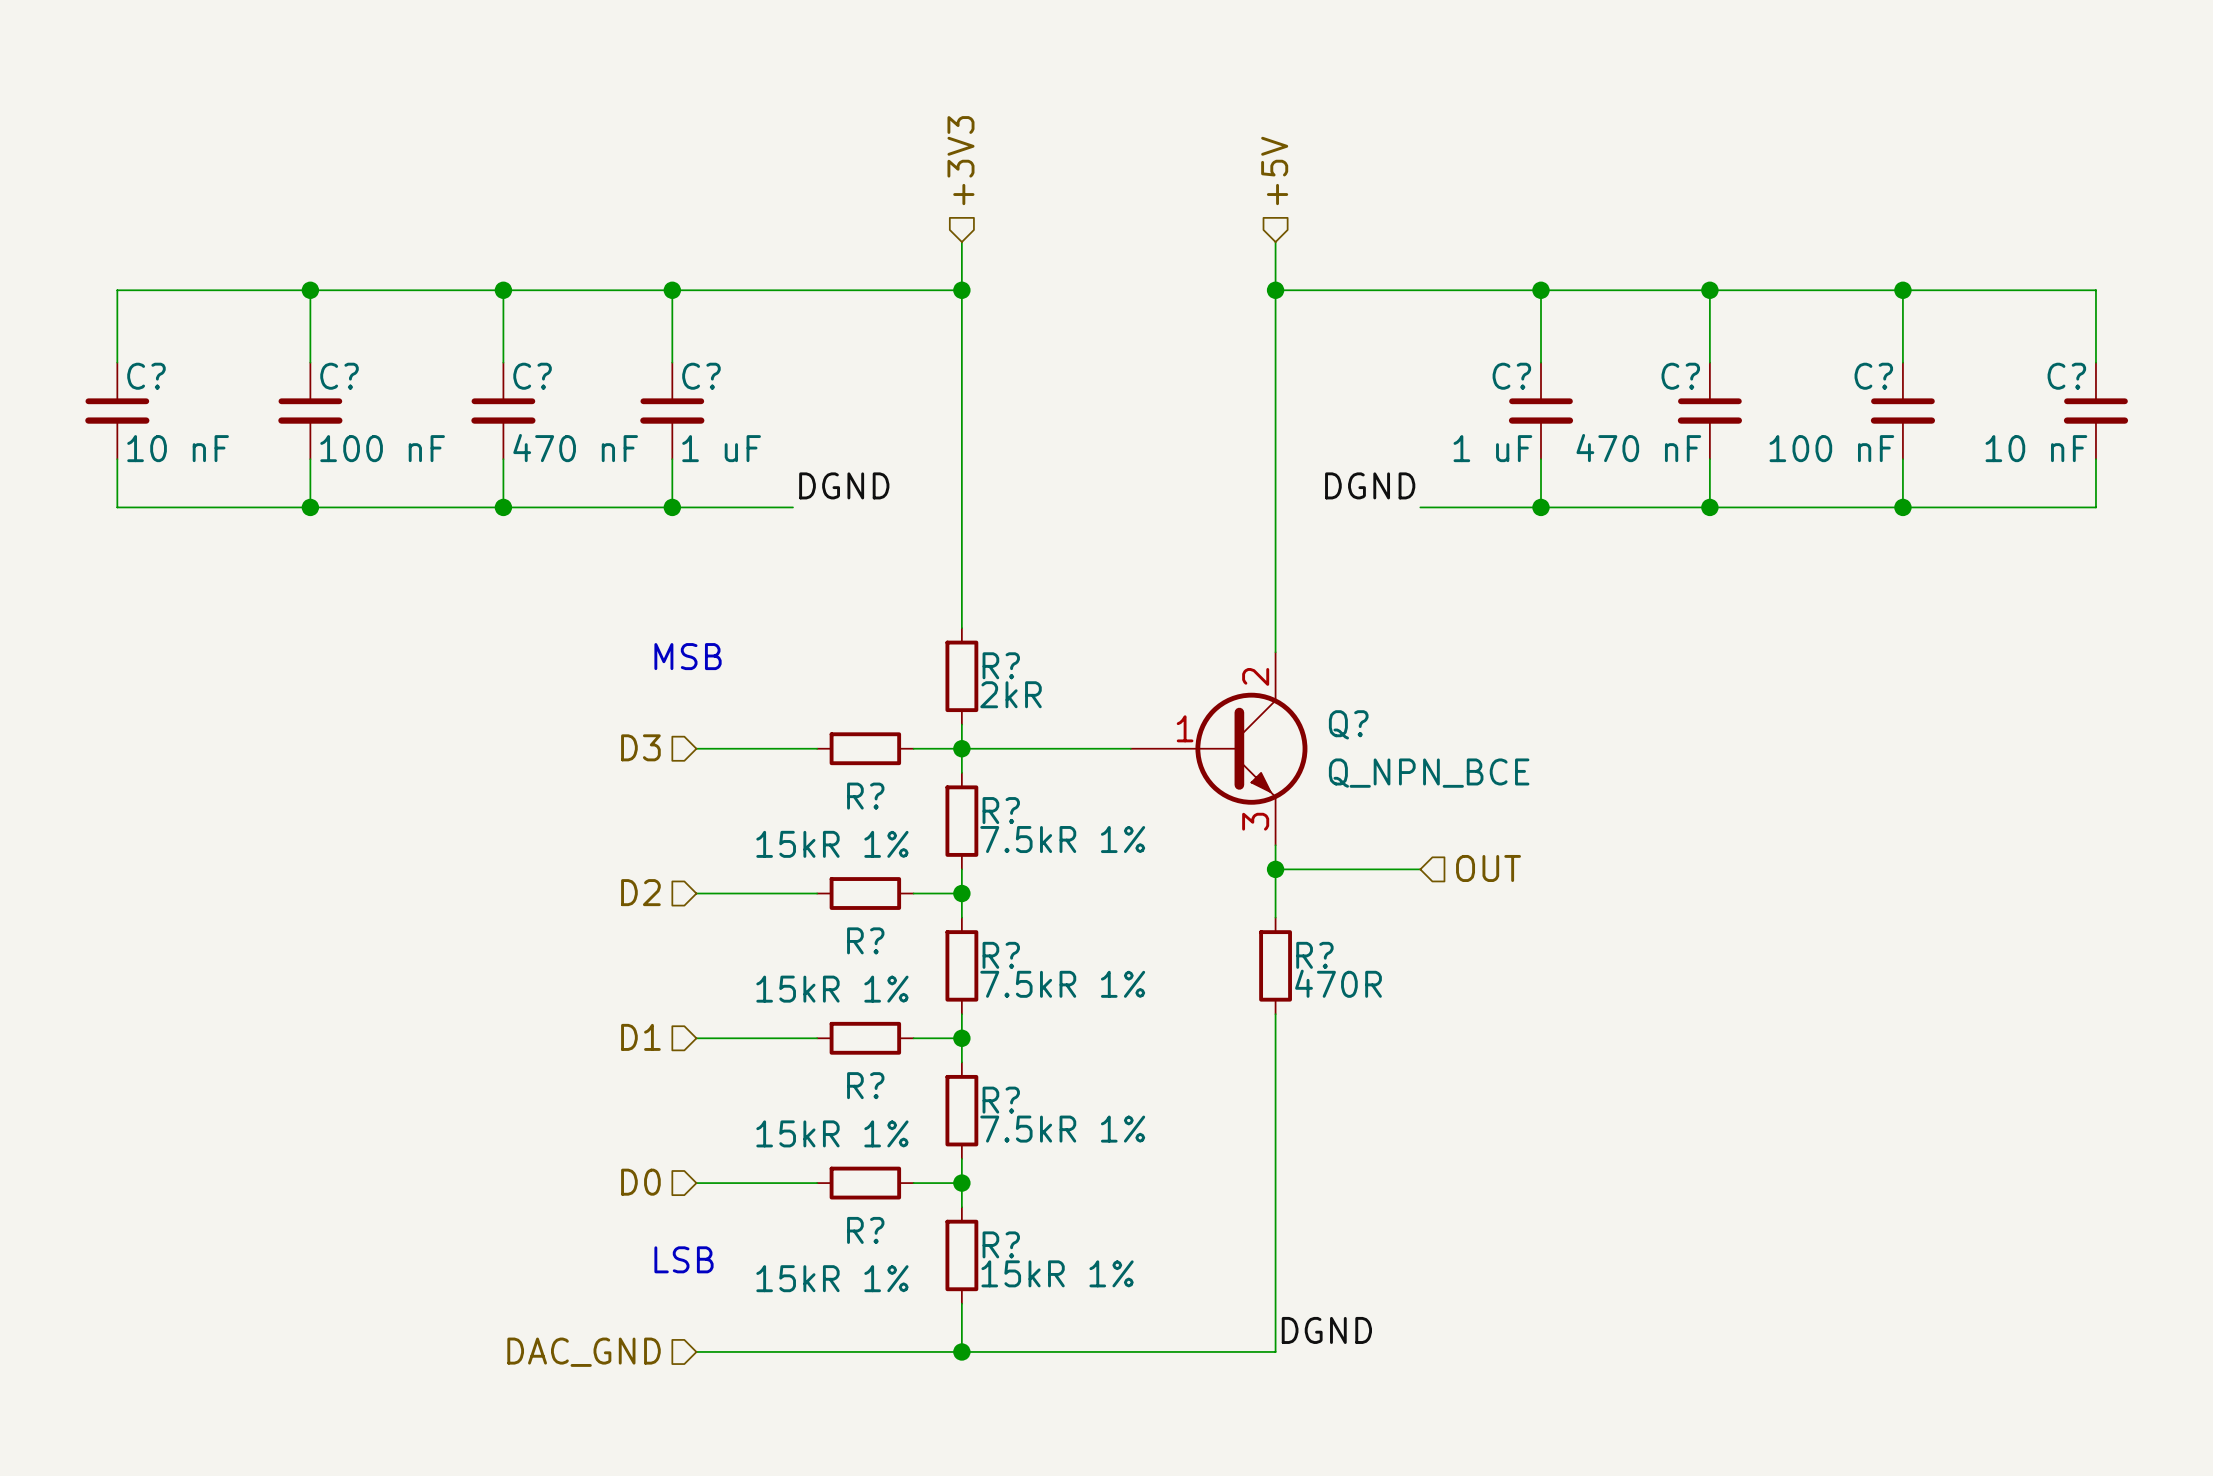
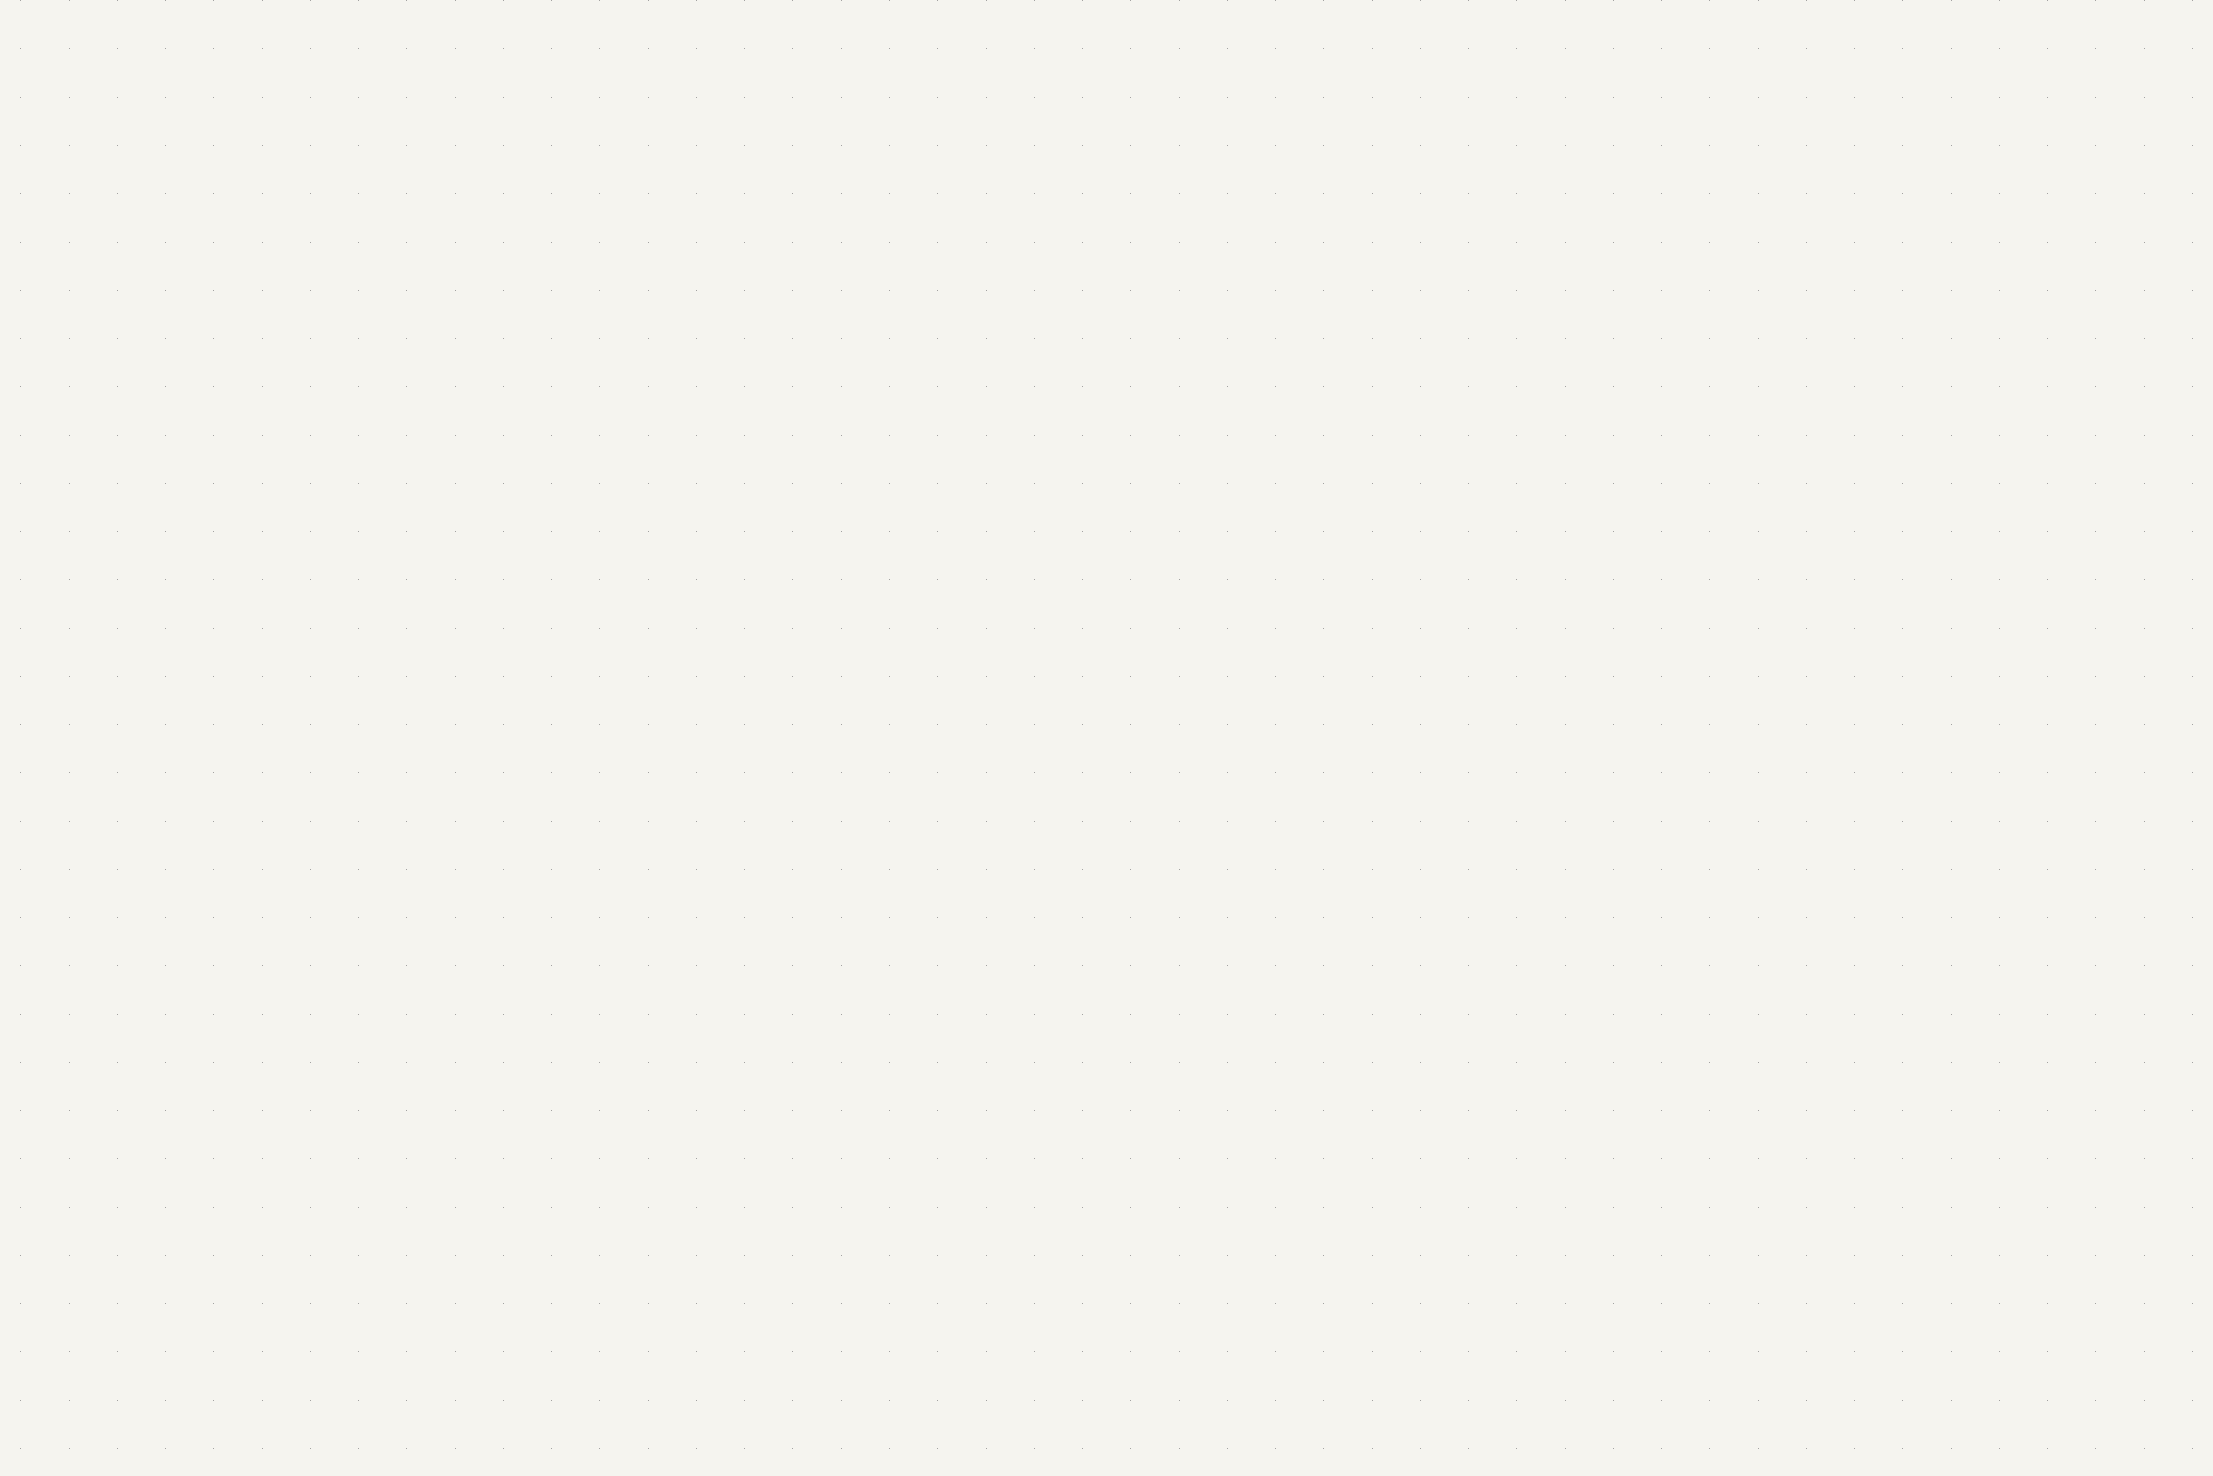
hierarchical label: +3V3 (960, 160) -> none
hierarchical label: +5V (1274, 170) -> none
wire: (961, 242) (961, 628) -> none
wire: (1275, 242) (1275, 652) -> none
wire: (310, 290) (310, 362) -> none
junction: (310, 290) -> none
wire: (503, 290) (503, 362) -> none
junction: (503, 290) -> none
wire: (672, 290) (672, 362) -> none
junction: (672, 290) -> none
wire: (961, 290) (117, 290) (117, 362) -> none
junction: (961, 290) -> none
wire: (1275, 290) (2095, 290) (2095, 362) -> none
junction: (1275, 290) -> none
wire: (1540, 290) (1540, 362) -> none
junction: (1540, 290) -> none
wire: (1709, 290) (1709, 362) -> none
junction: (1709, 290) -> none
wire: (1902, 290) (1902, 362) -> none
junction: (1902, 290) -> none
C?: 10 nF (117, 410) -> none
C?: 100 nF (310, 410) -> none
C?: 470 nF (503, 410) -> none
C?: 1 uF (672, 410) -> none
C?: 1 uF (1540, 410) -> none
C?: 470 nF (1709, 410) -> none
C?: 100 nF (1902, 410) -> none
C?: 10 nF (2095, 410) -> none
wire: (117, 459) (117, 507) (792, 507) -> none
wire: (310, 459) (310, 507) -> none
wire: (503, 459) (503, 507) -> none
wire: (672, 459) (672, 507) -> none
wire: (1540, 459) (1540, 507) -> none
wire: (1709, 459) (1709, 507) -> none
wire: (1902, 459) (1902, 507) -> none
wire: (2095, 459) (2095, 507) (1420, 507) -> none
label: DGND (844, 485) -> none
label: DGND (1370, 485) -> none
junction: (310, 507) -> none
junction: (503, 507) -> none
junction: (672, 507) -> none
junction: (1540, 507) -> none
junction: (1709, 507) -> none
junction: (1902, 507) -> none
text: MSB (688, 656) -> none
R?: 2kR (961, 676) -> none
wire: (961, 724) (961, 772) -> none
hierarchical label: D3 (640, 747) -> none
wire: (696, 748) (817, 748) -> none
R?: 15kR 1% (865, 748) -> none
wire: (913, 748) (1130, 748) -> none
junction: (961, 748) -> none
Q?: Q_NPN_BCE (1219, 748) -> none
R?: 7.5kR 1% (961, 821) -> none
wire: (1275, 845) (1275, 917) -> none
hierarchical label: OUT (1488, 868) -> none
wire: (961, 869) (961, 917) -> none
wire: (1275, 869) (1420, 869) -> none
junction: (1275, 869) -> none
hierarchical label: D2 (640, 892) -> none
wire: (696, 893) (817, 893) -> none
R?: 15kR 1% (865, 893) -> none
wire: (913, 893) (961, 893) -> none
junction: (961, 893) -> none
R?: 7.5kR 1% (961, 965) -> none
R?: 470R (1275, 965) -> none
wire: (961, 1014) (961, 1062) -> none
wire: (1275, 1014) (1275, 1351) (696, 1351) -> none
hierarchical label: D1 (640, 1037) -> none
wire: (696, 1038) (817, 1038) -> none
R?: 15kR 1% (865, 1038) -> none
wire: (913, 1038) (961, 1038) -> none
junction: (961, 1038) -> none
R?: 7.5kR 1% (961, 1110) -> none
wire: (961, 1158) (961, 1207) -> none
hierarchical label: D0 (640, 1182) -> none
wire: (696, 1183) (817, 1183) -> none
R?: 15kR 1% (865, 1183) -> none
wire: (913, 1183) (961, 1183) -> none
junction: (961, 1183) -> none
R?: 15kR 1% (961, 1255) -> none
text: LSB (683, 1259) -> none
wire: (961, 1303) (961, 1351) -> none
label: DGND (1326, 1330) -> none
junction: (961, 1351) -> none
hierarchical label: DAC_GND (584, 1352) -> none

